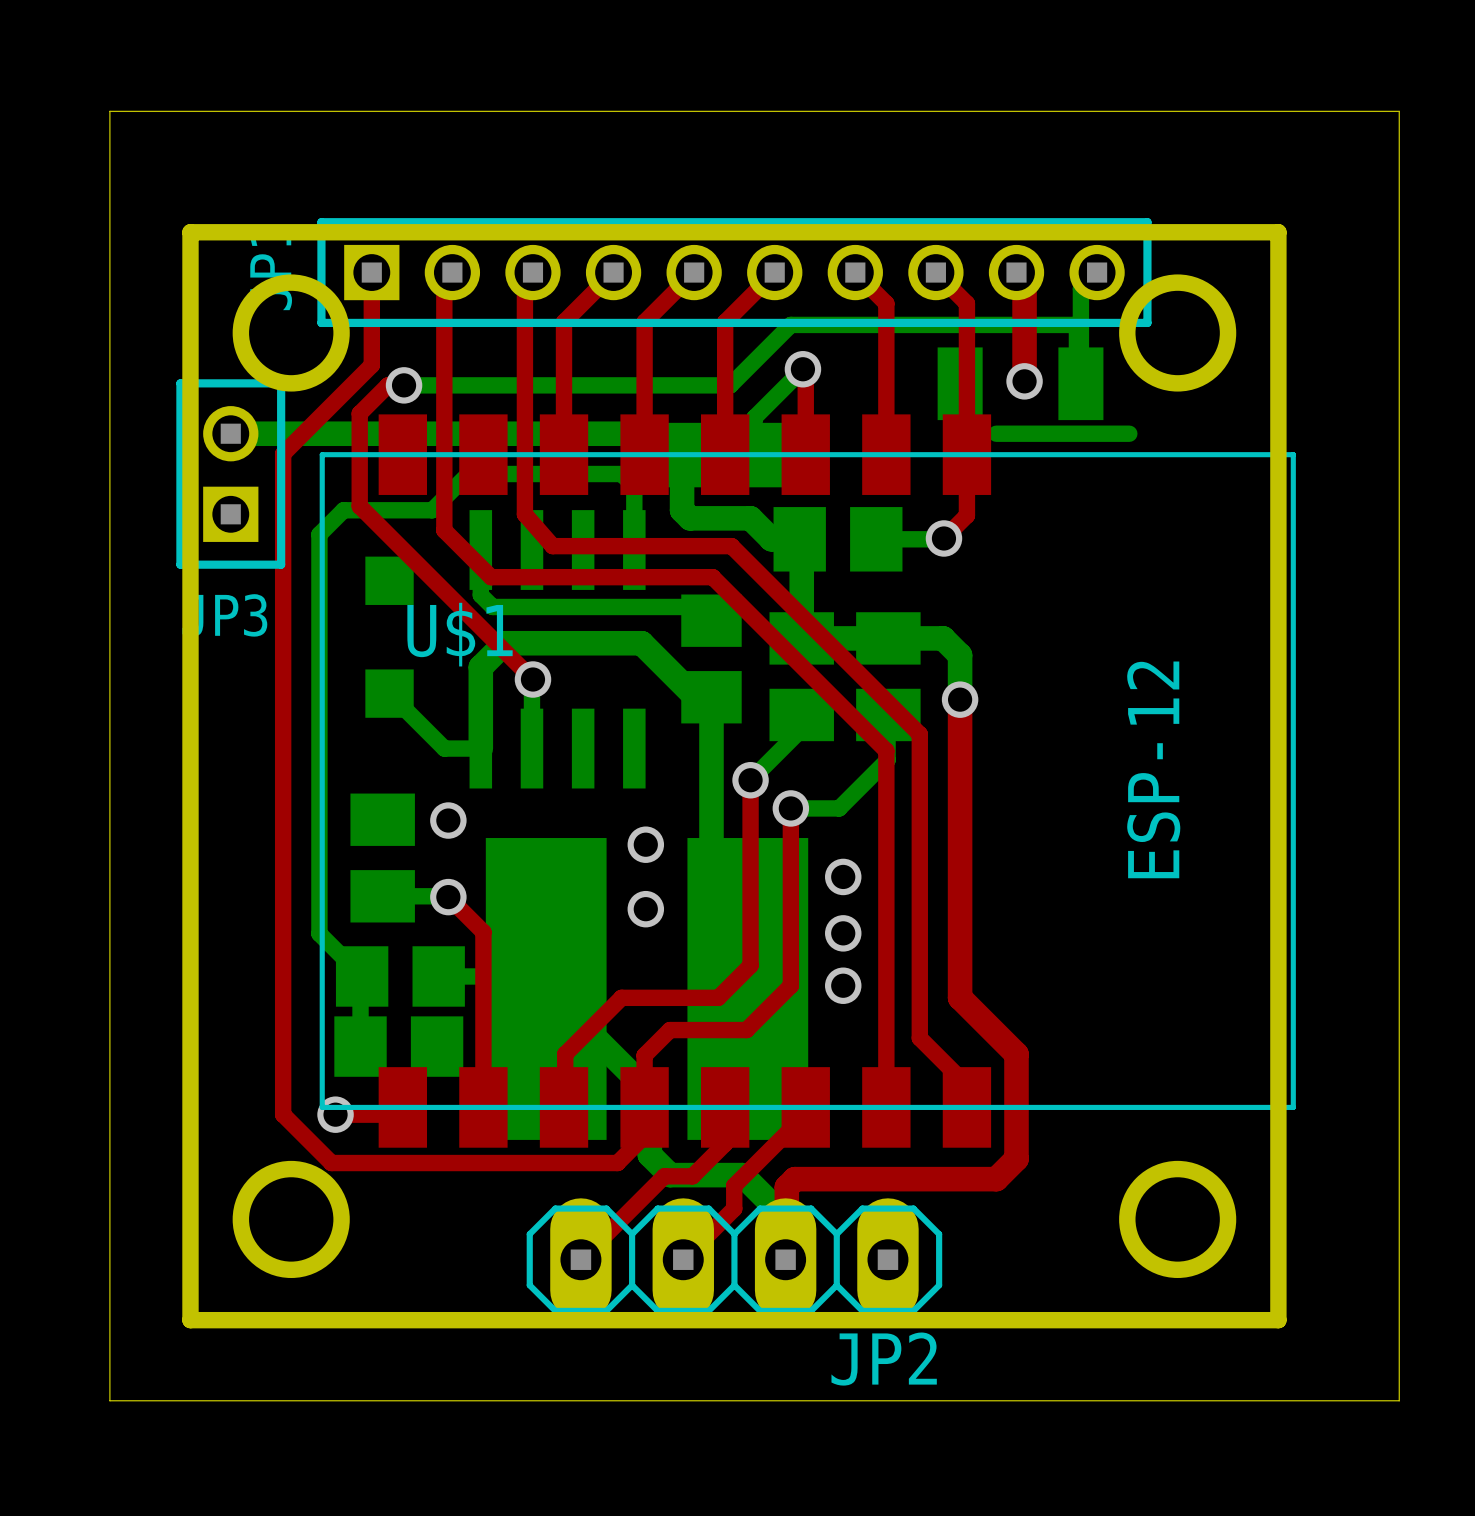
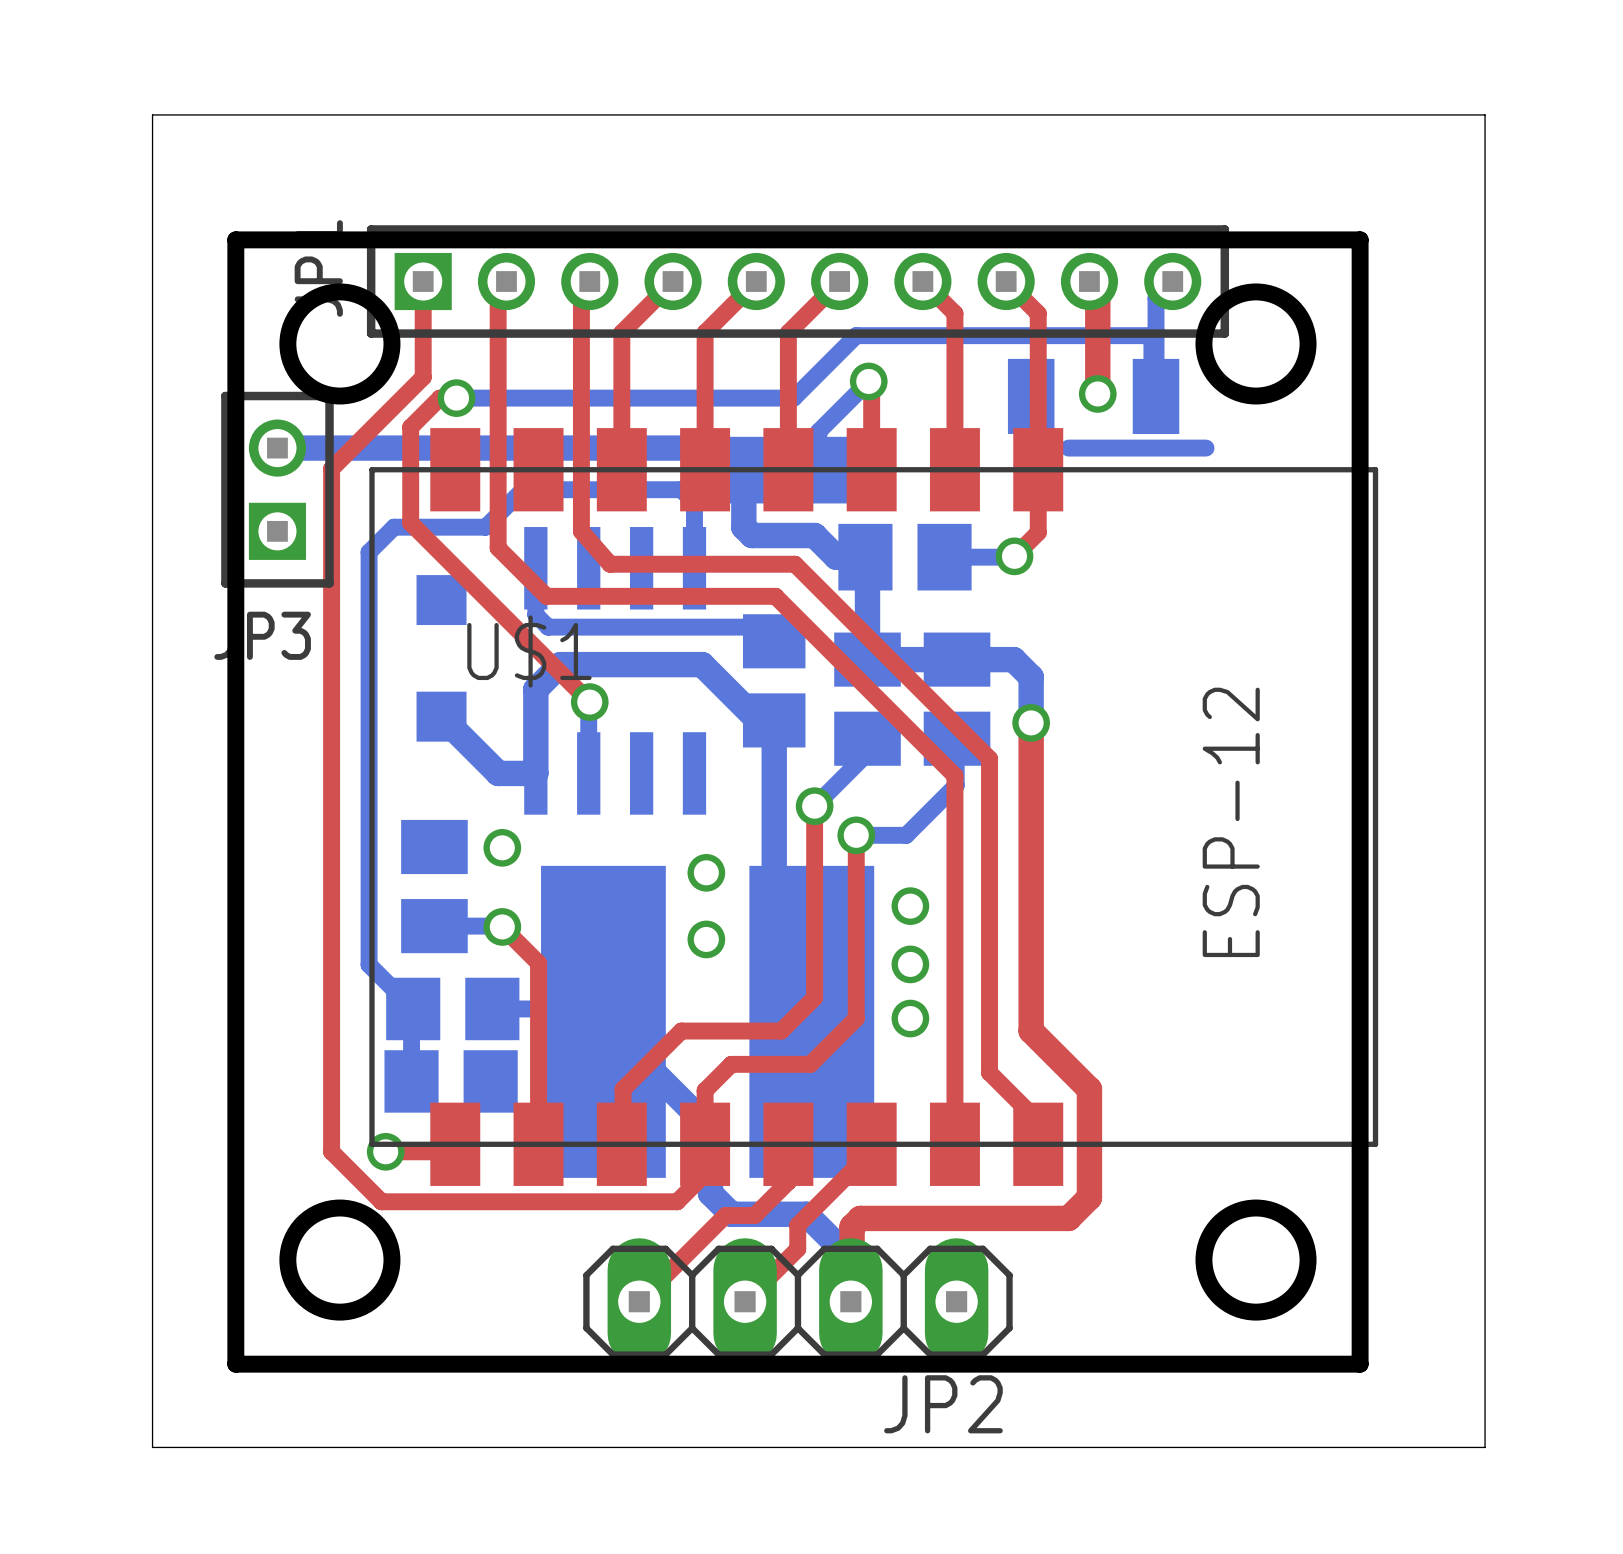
bottom track width: thin (389, 693) (444, 748) (480, 748) -> thick (441, 716) (498, 773) (535, 773)

